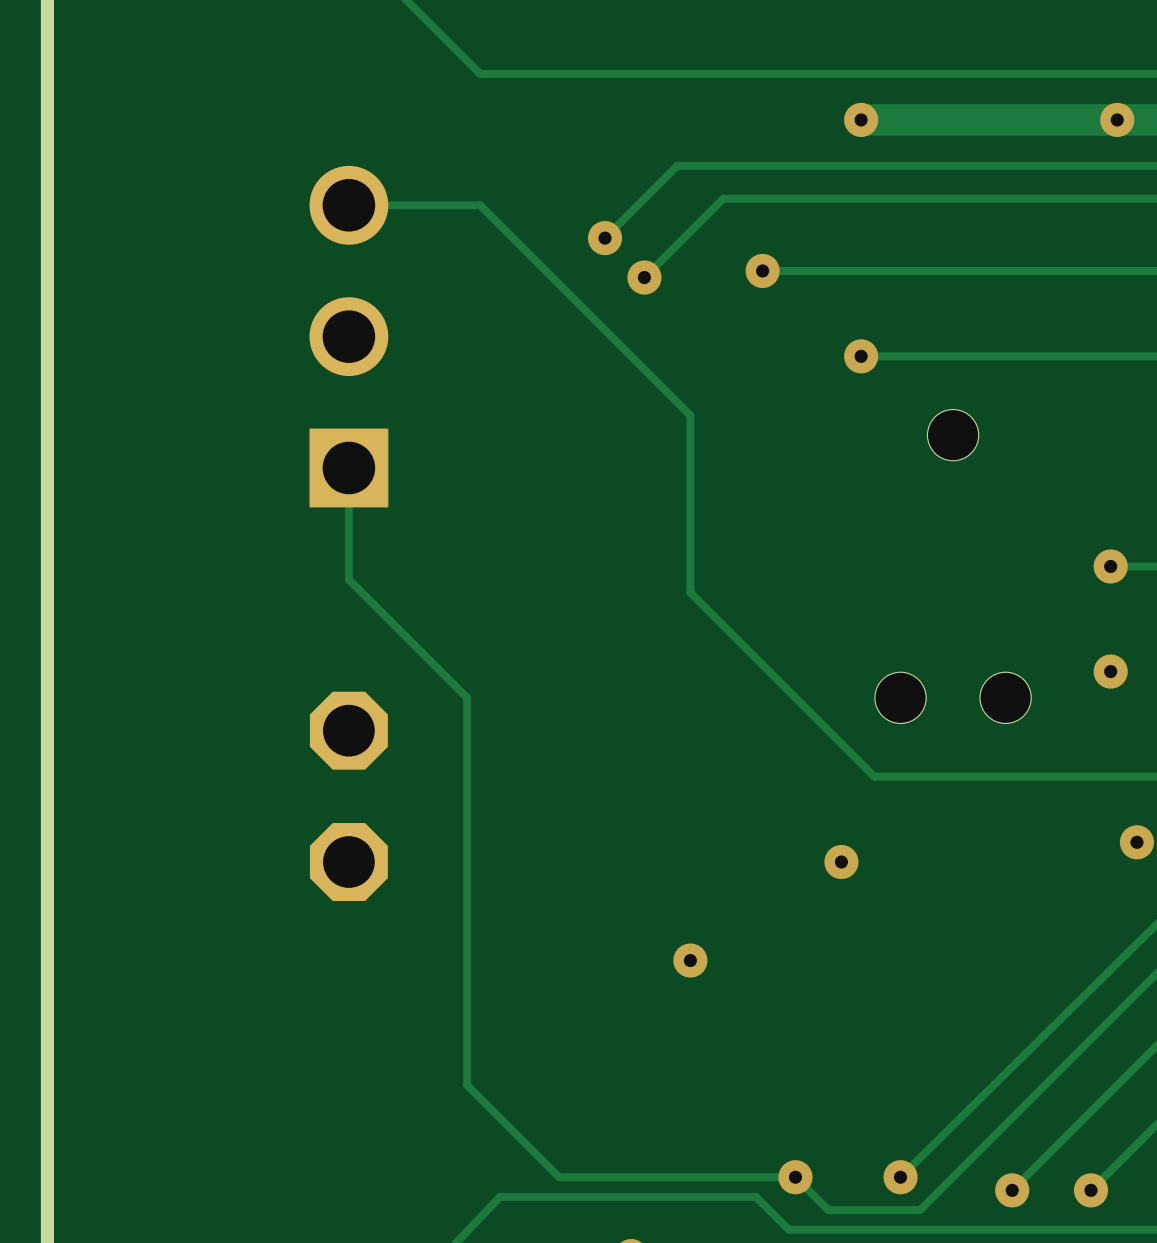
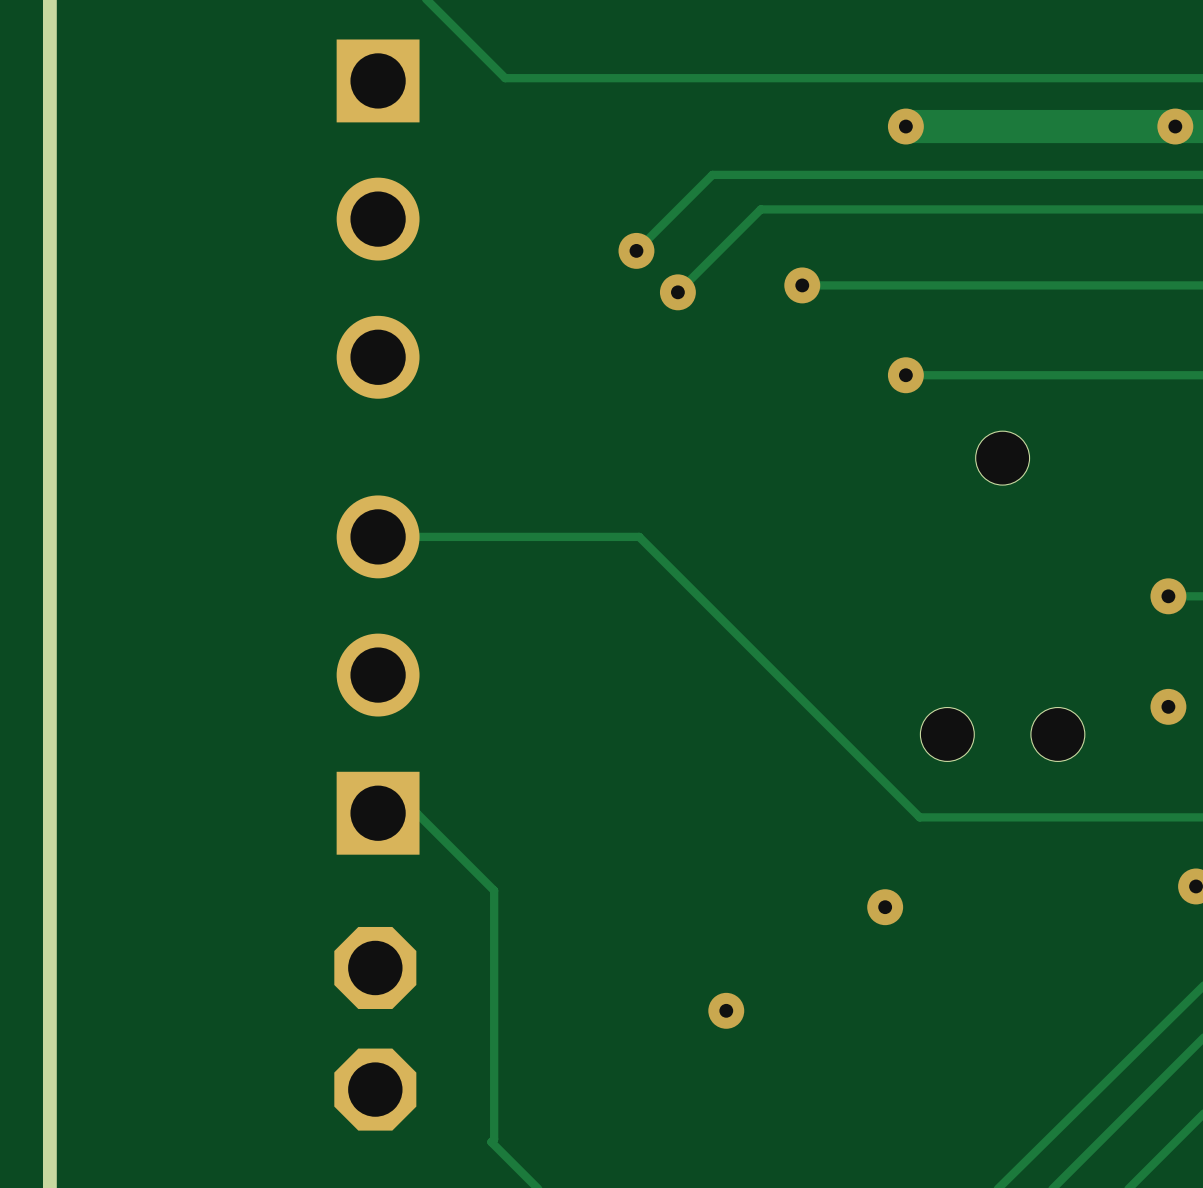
track: (348, 205) (480, 205) (690, 415) (690, 592) -> (378, 536) (639, 536) (726, 623)
part rotation: 0° (348, 336) -> 180° (378, 219)
track: (348, 467) (348, 579) (467, 697) (467, 1085) -> (378, 813) (416, 813) (494, 890) (494, 1139) (491, 1142)
part: none -> (378, 675)
part: (348, 730) -> none
part position: (348, 862) -> (375, 967)
part: none -> (375, 1089)

